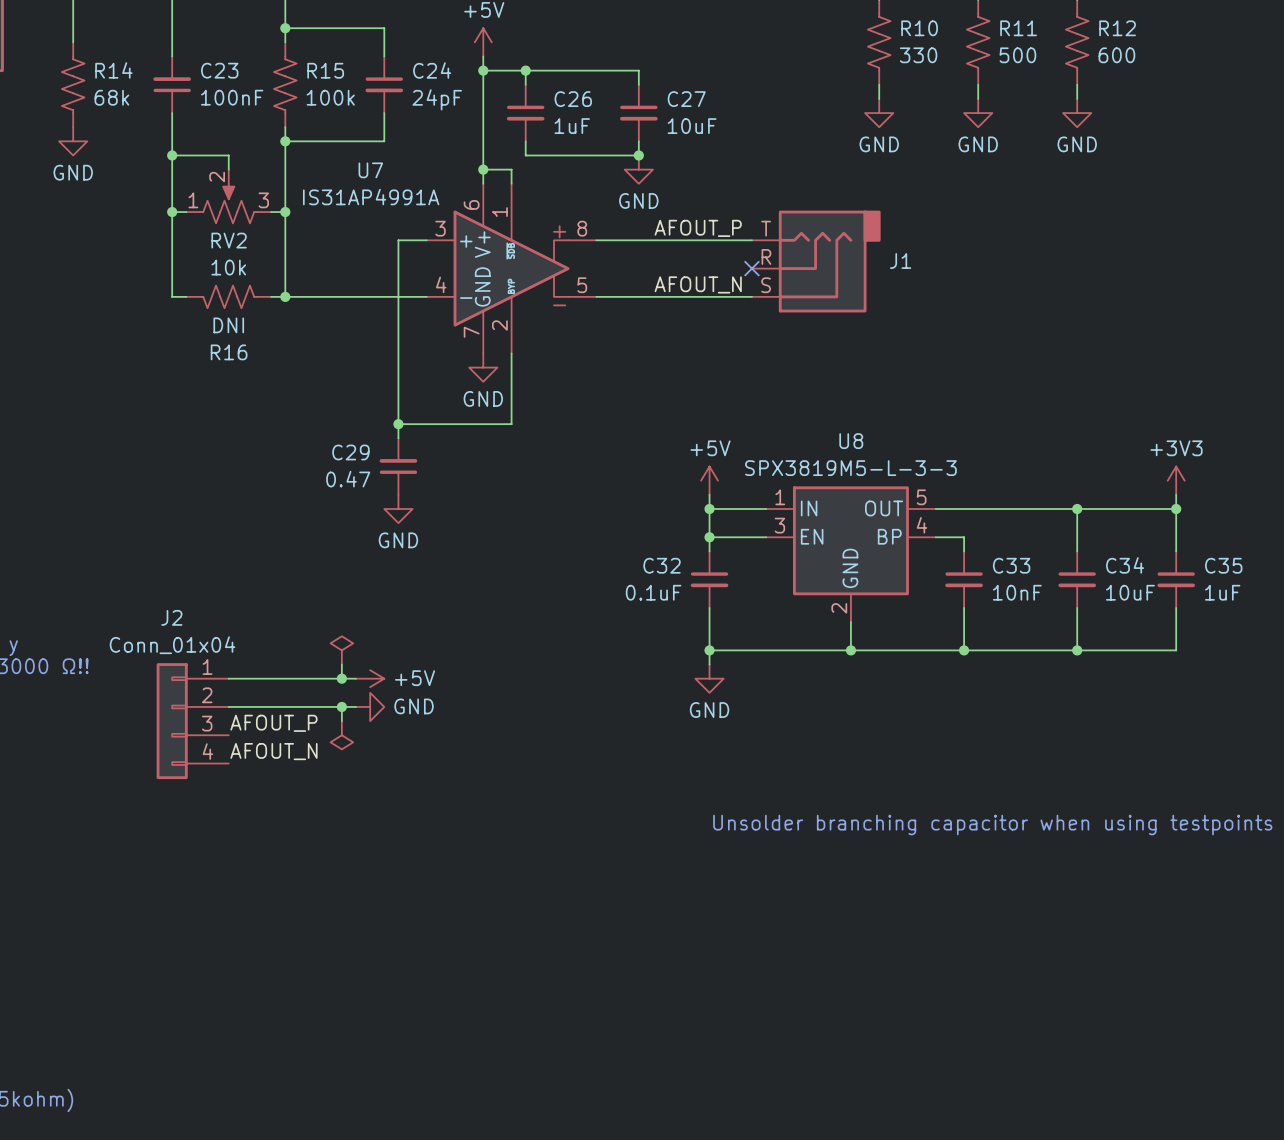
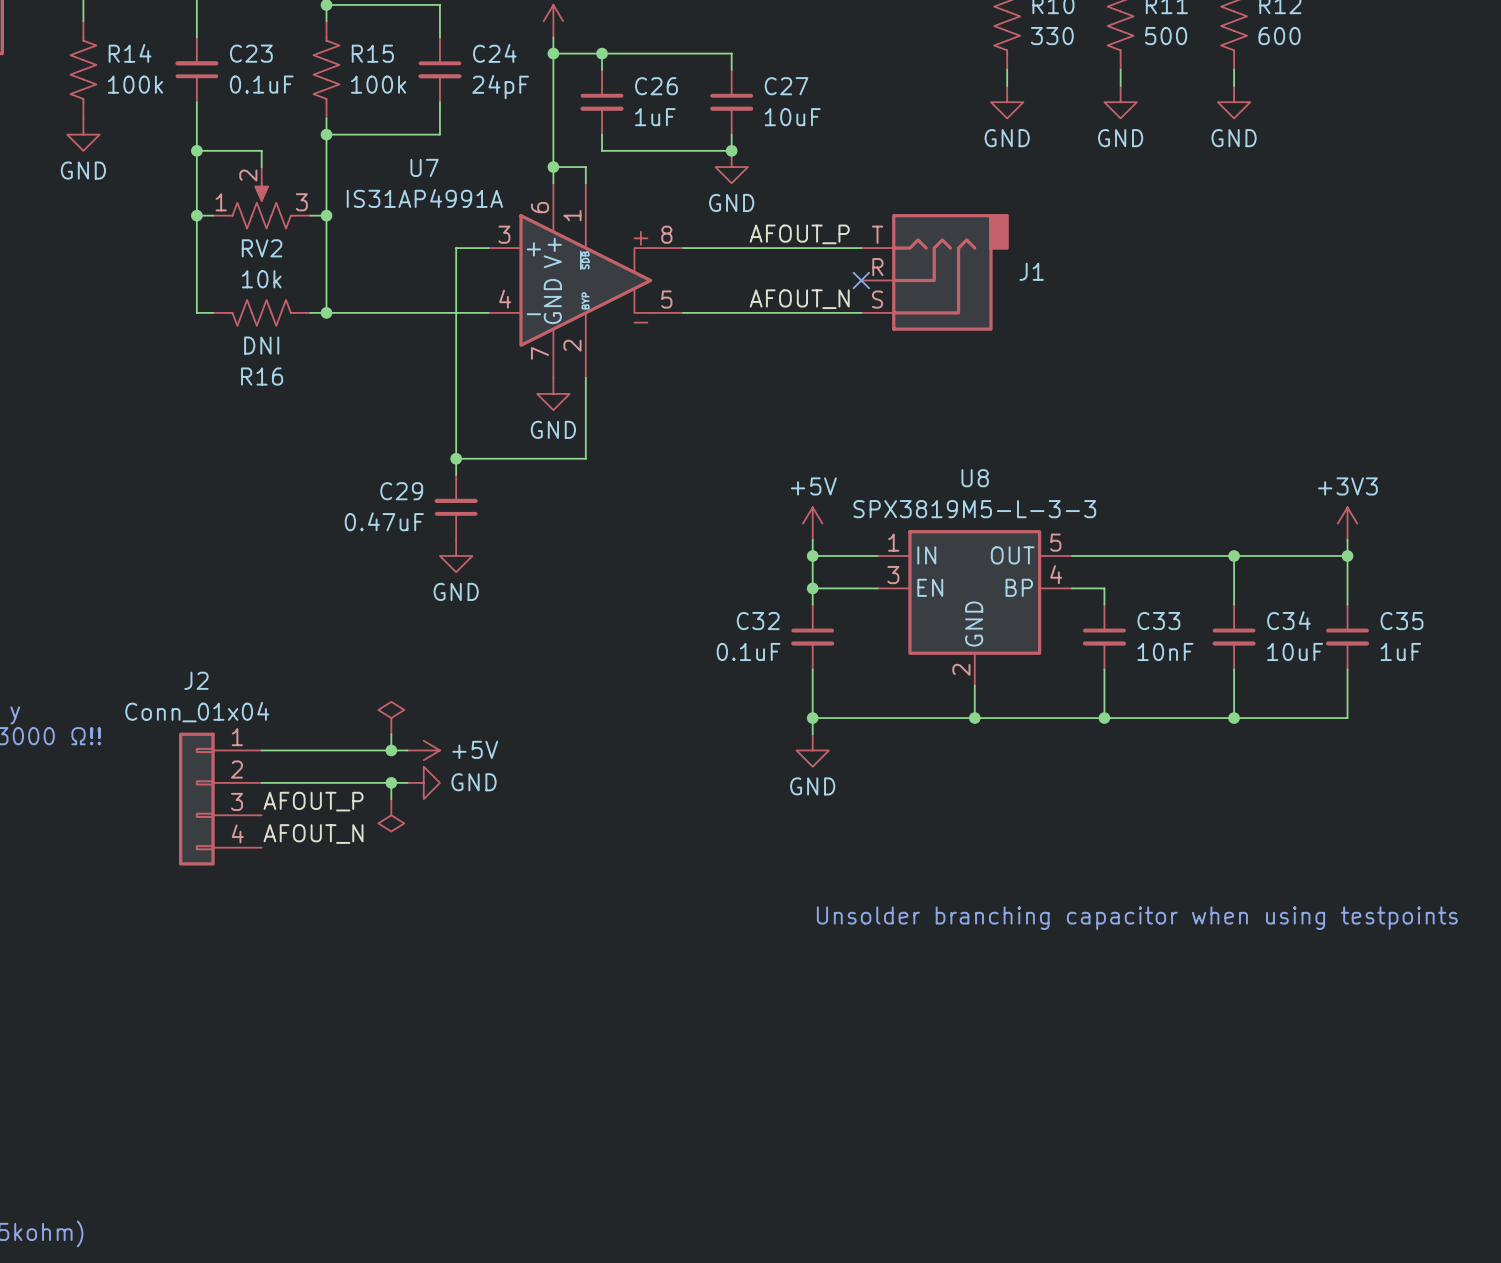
R14 value: 68k (111, 97) -> 100k (135, 84)
C23 value: 100nF (232, 97) -> 0.1uF (261, 84)
C29 value: 0.47 (348, 479) -> 0.47uF (384, 521)

